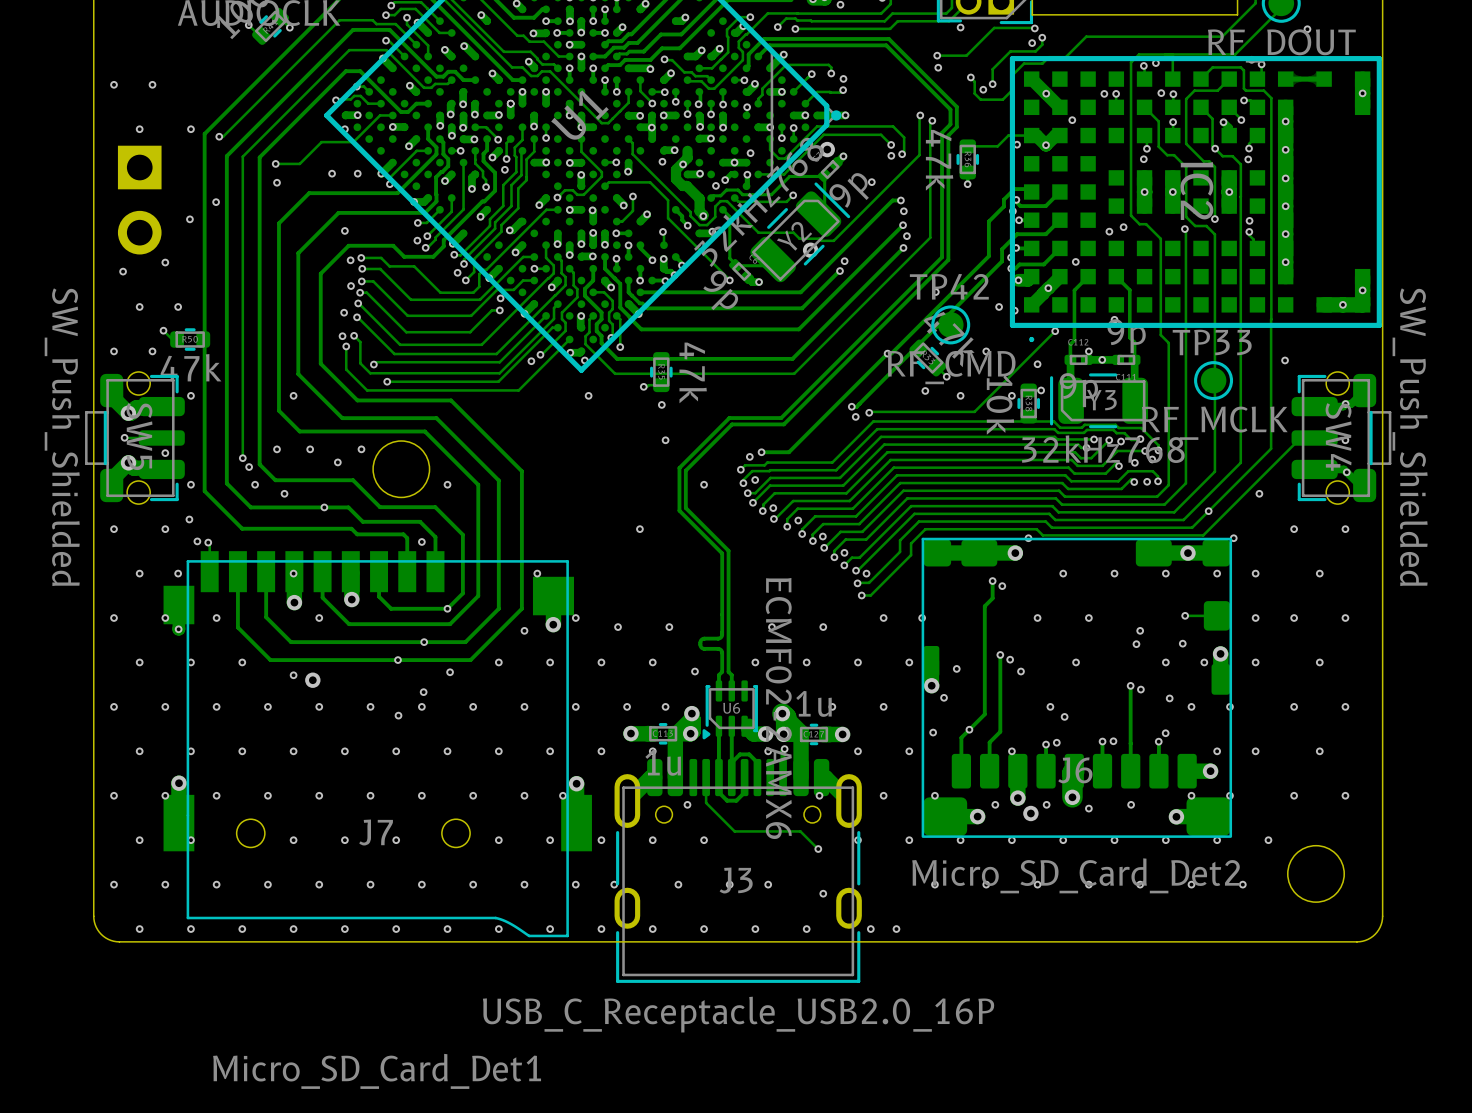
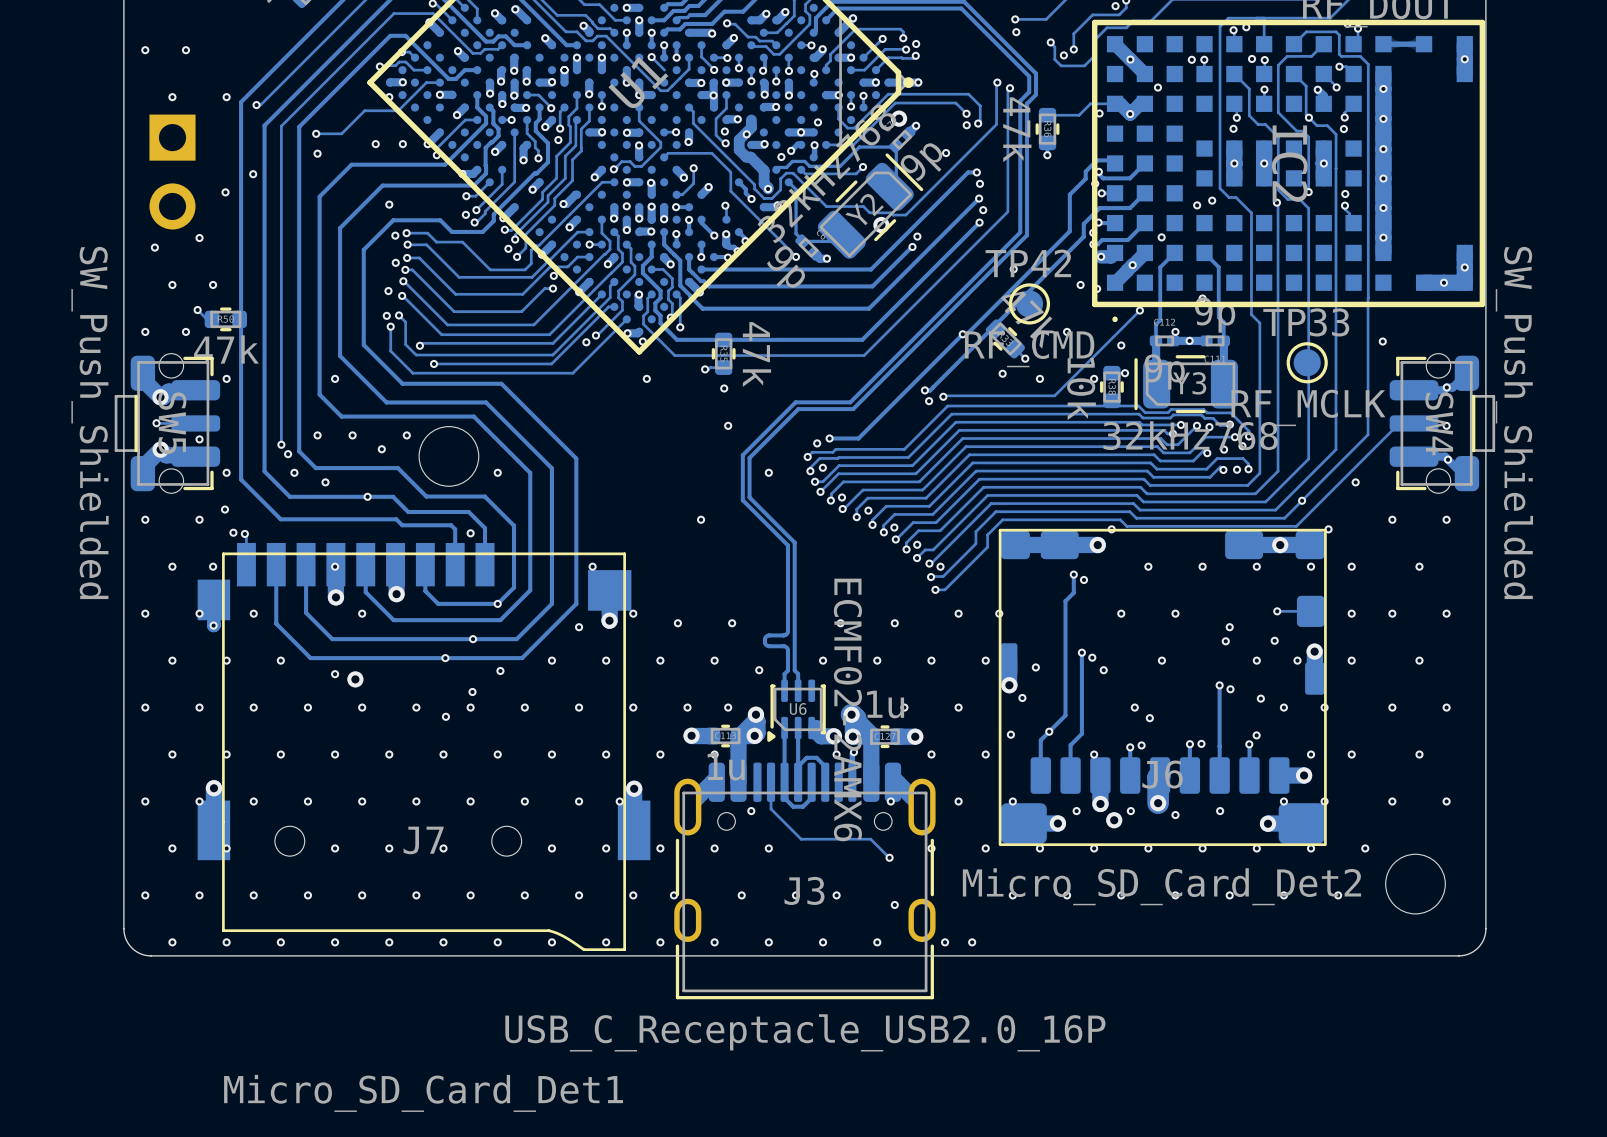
track: none -> (905, 49) (885, 49) (864, 70) (851, 70)
via: none -> (906, 49)
track: none -> (651, 57) (664, 70)
via: none -> (651, 57)
track: none -> (726, 95) (726, 108) (716, 118) (716, 135) (725, 143)
via: none -> (725, 143)
via: none -> (626, 206)

